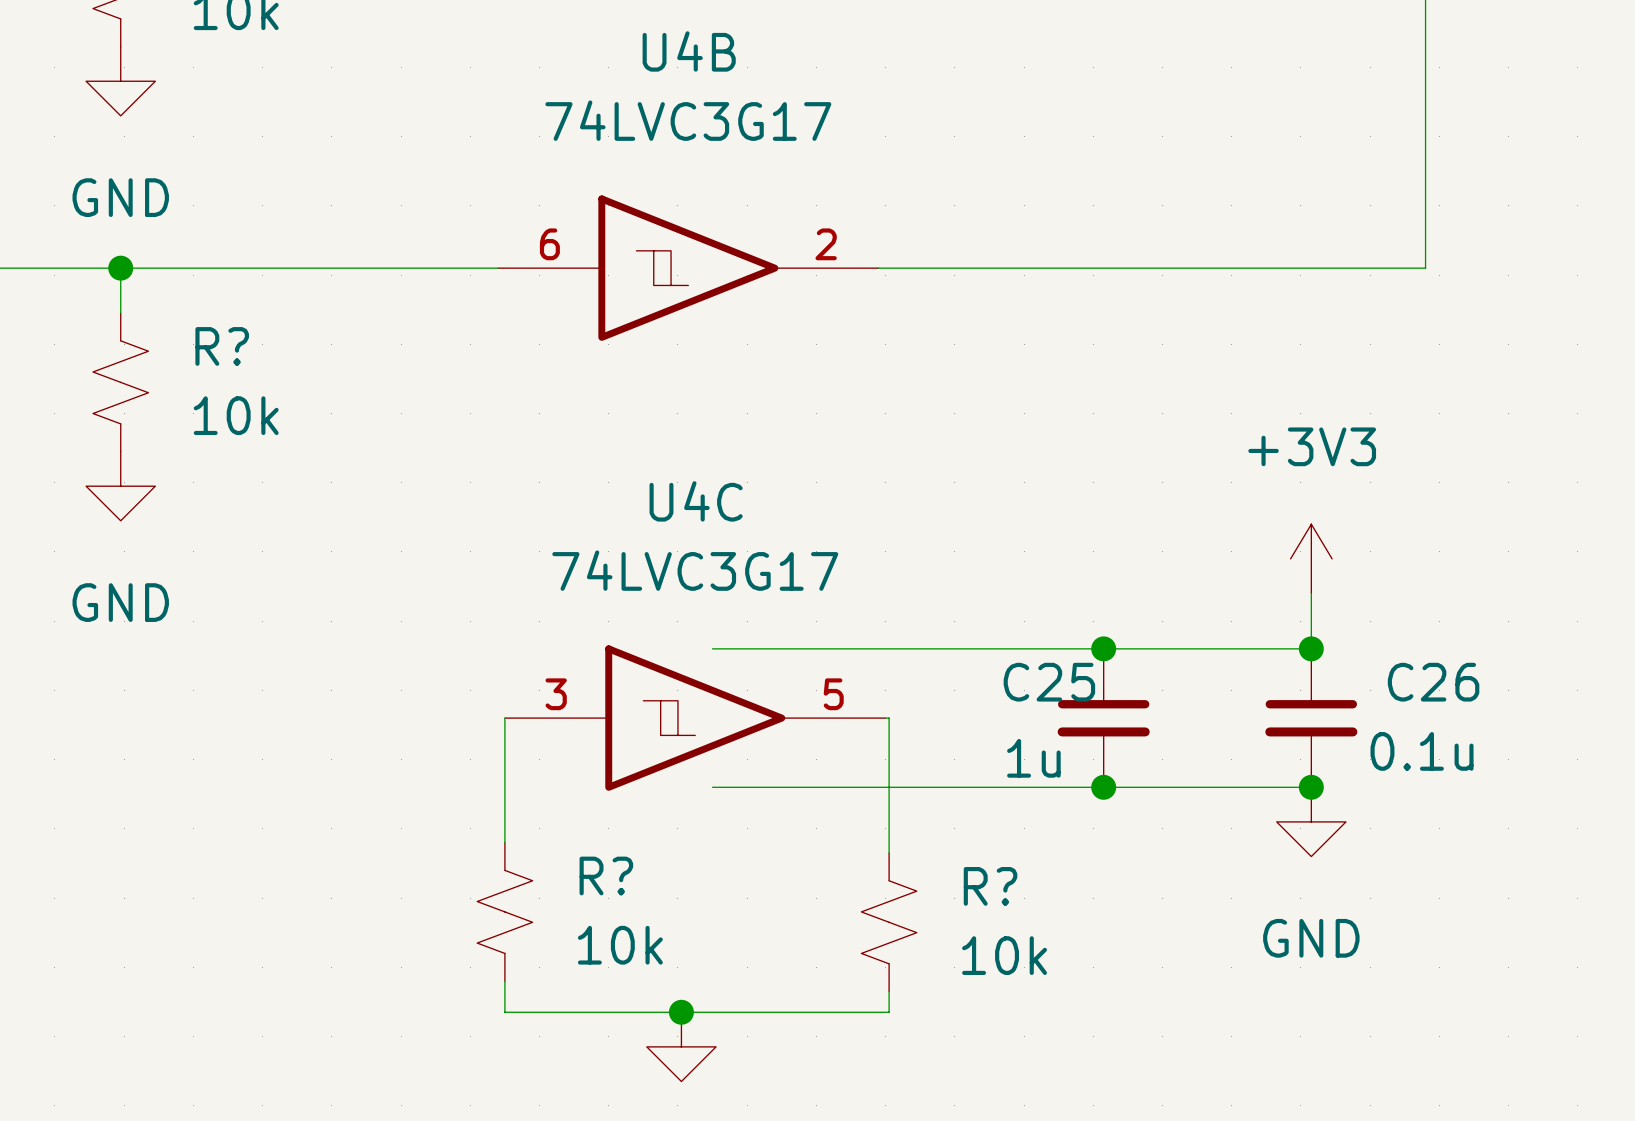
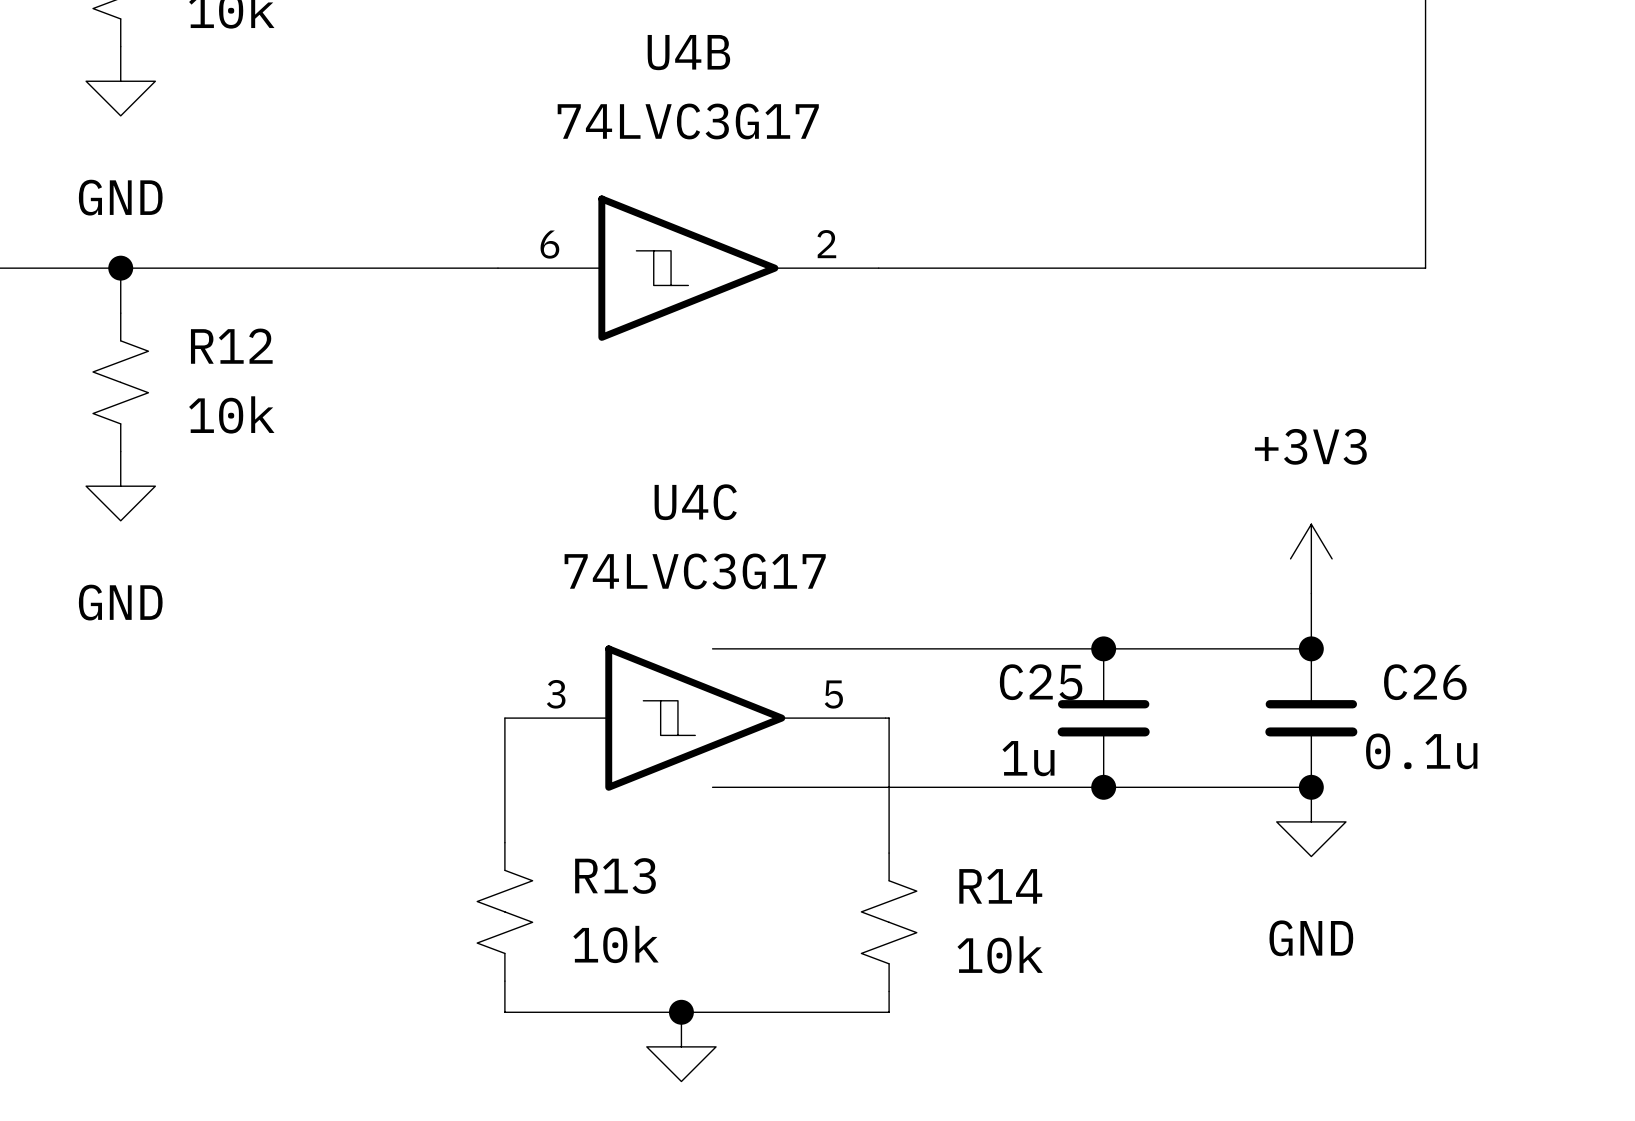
R? name: R? (222, 346) -> R12 (231, 346)
R? name: R? (606, 876) -> R13 (615, 876)
R? name: R? (990, 886) -> R14 (1000, 886)

